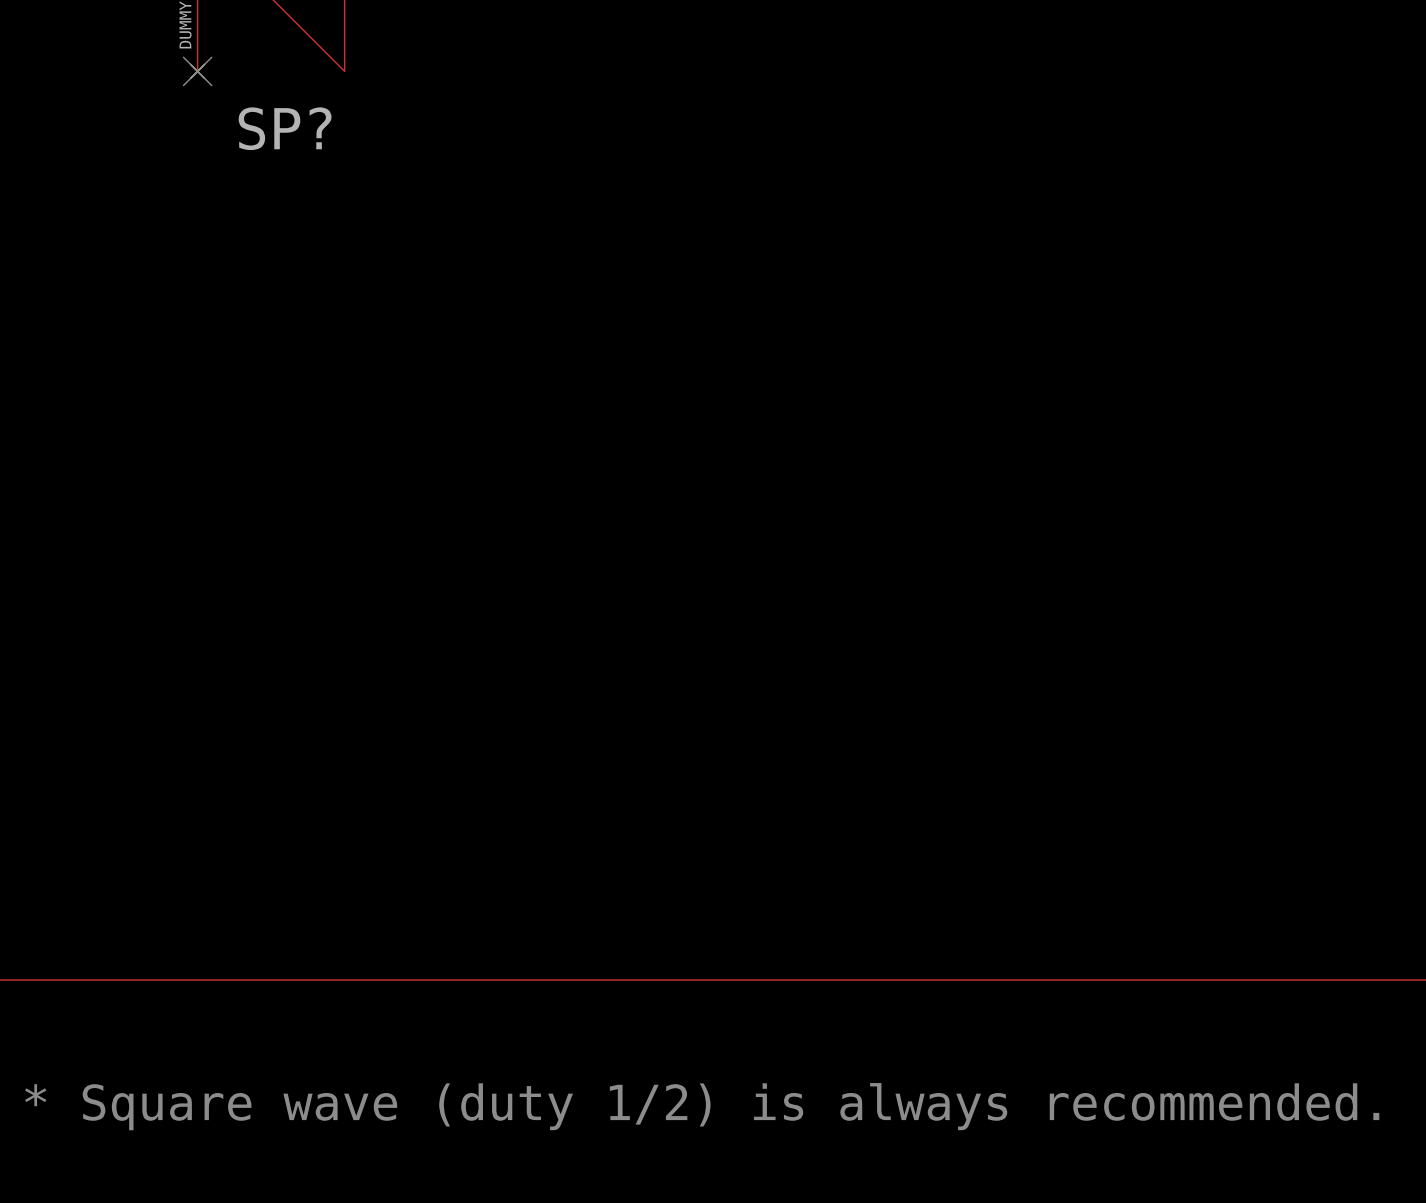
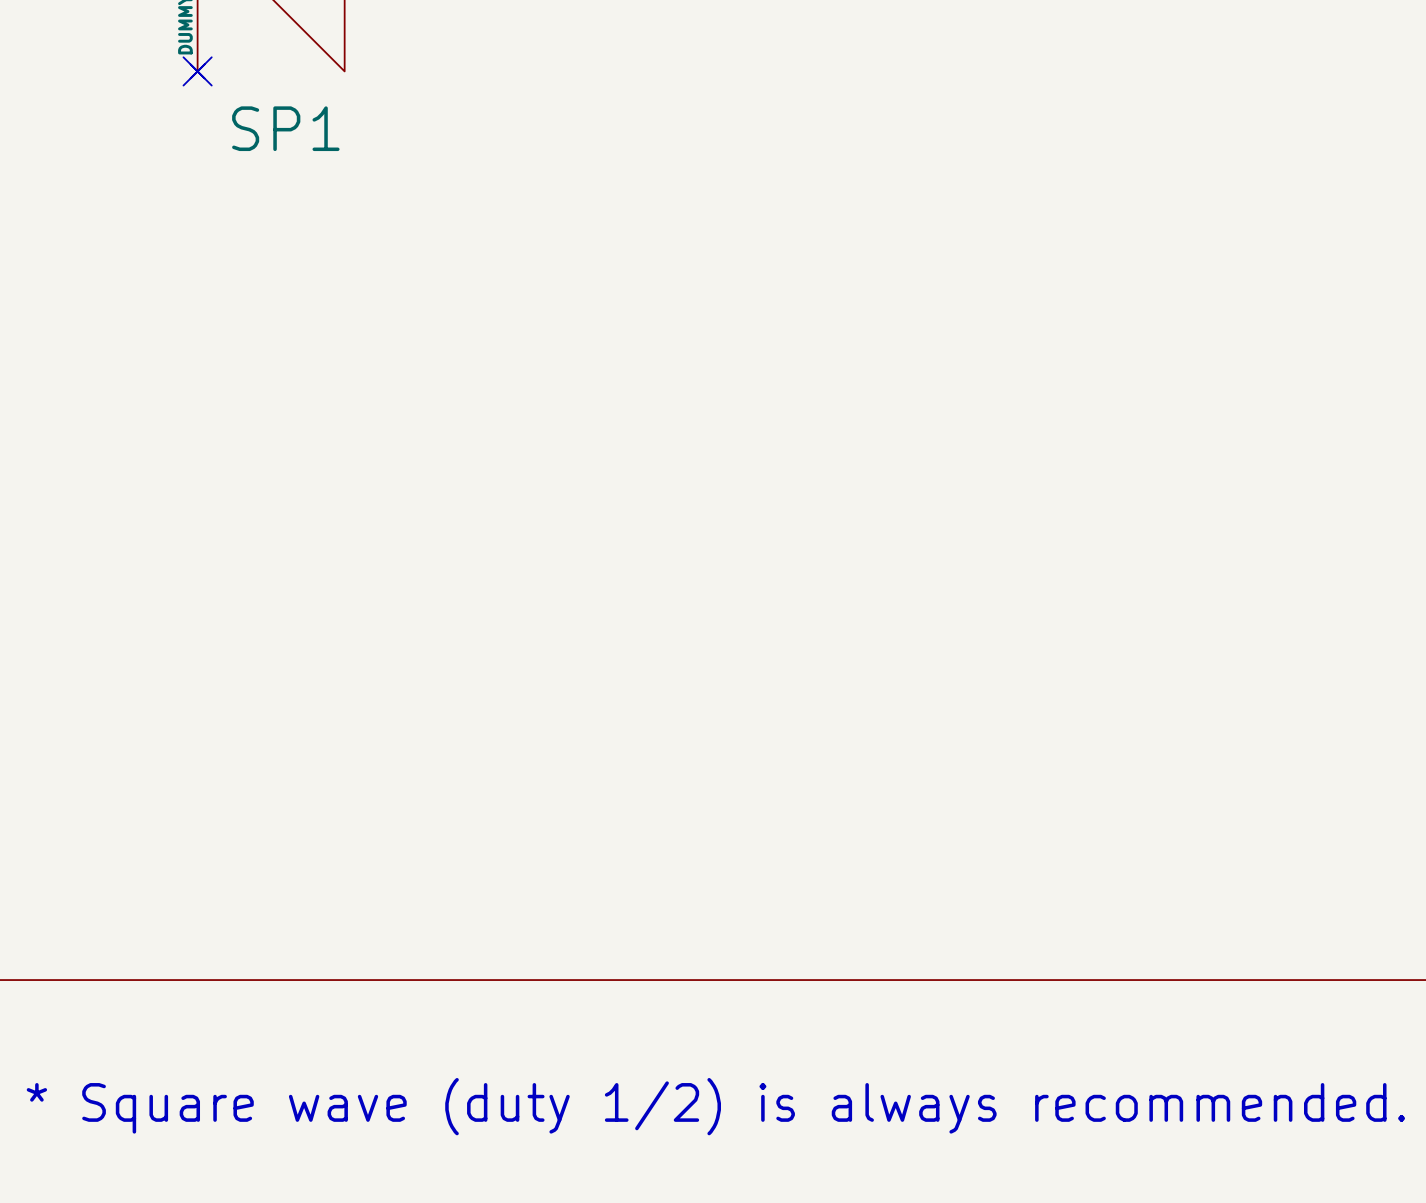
SP? name: SP? (285, 128) -> SP1 (285, 128)

